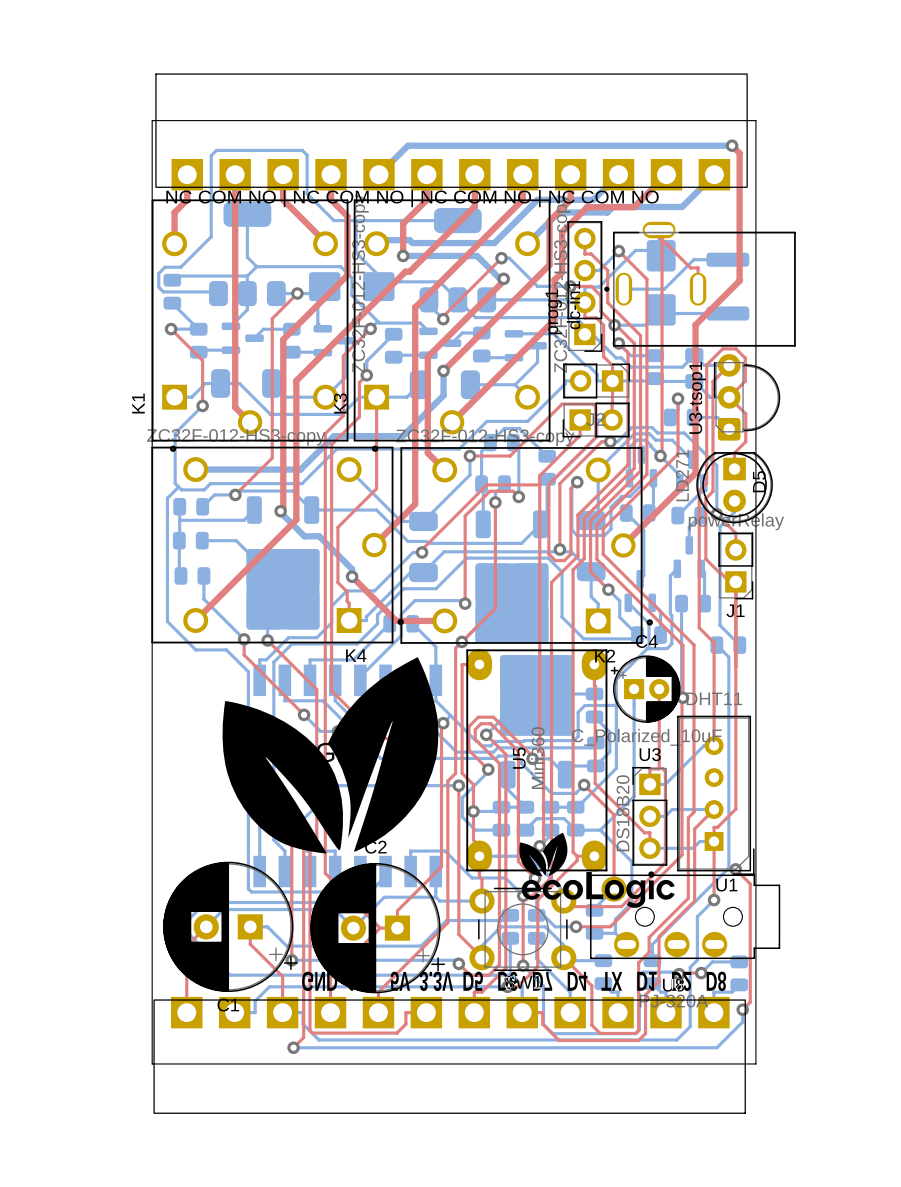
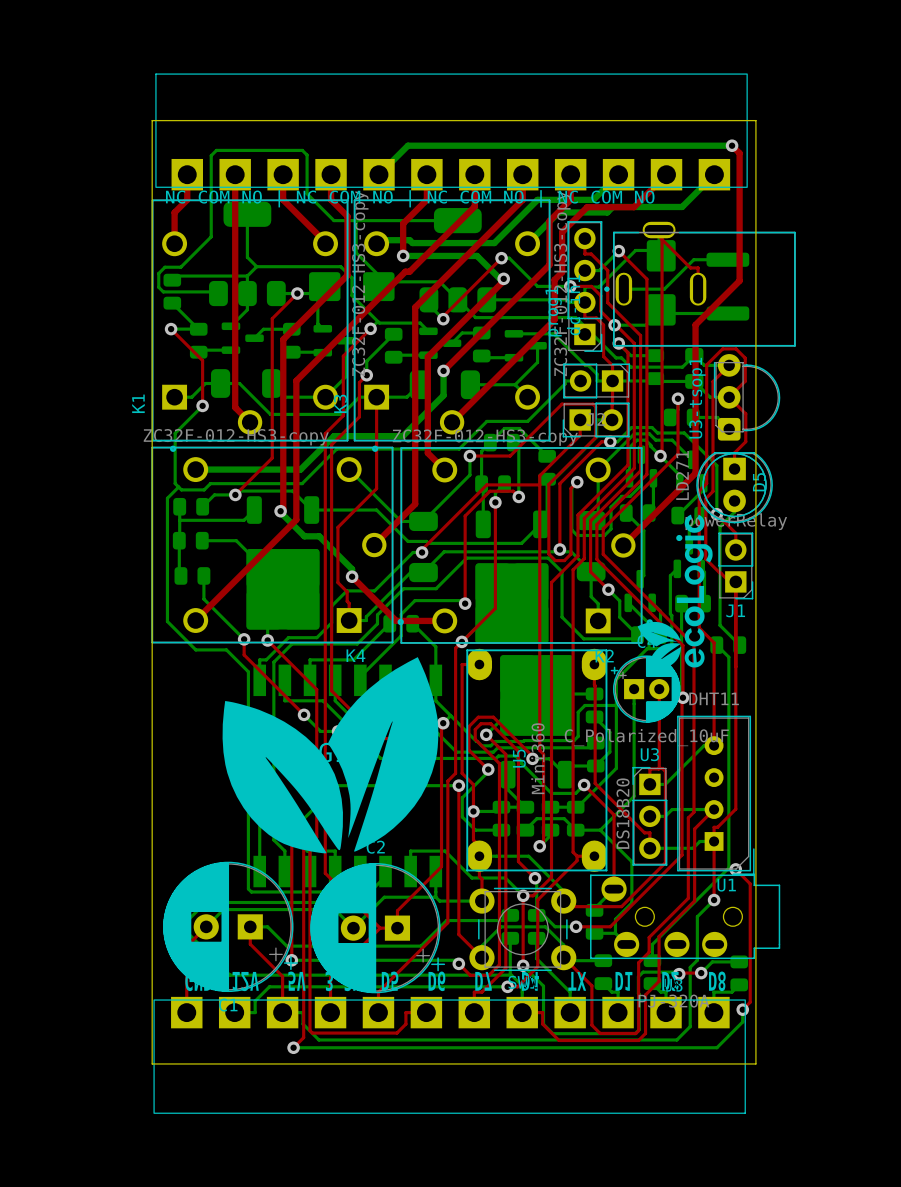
drawing: none -> [637, 514, 713, 670]
drawing: [519, 832, 675, 908] -> none

